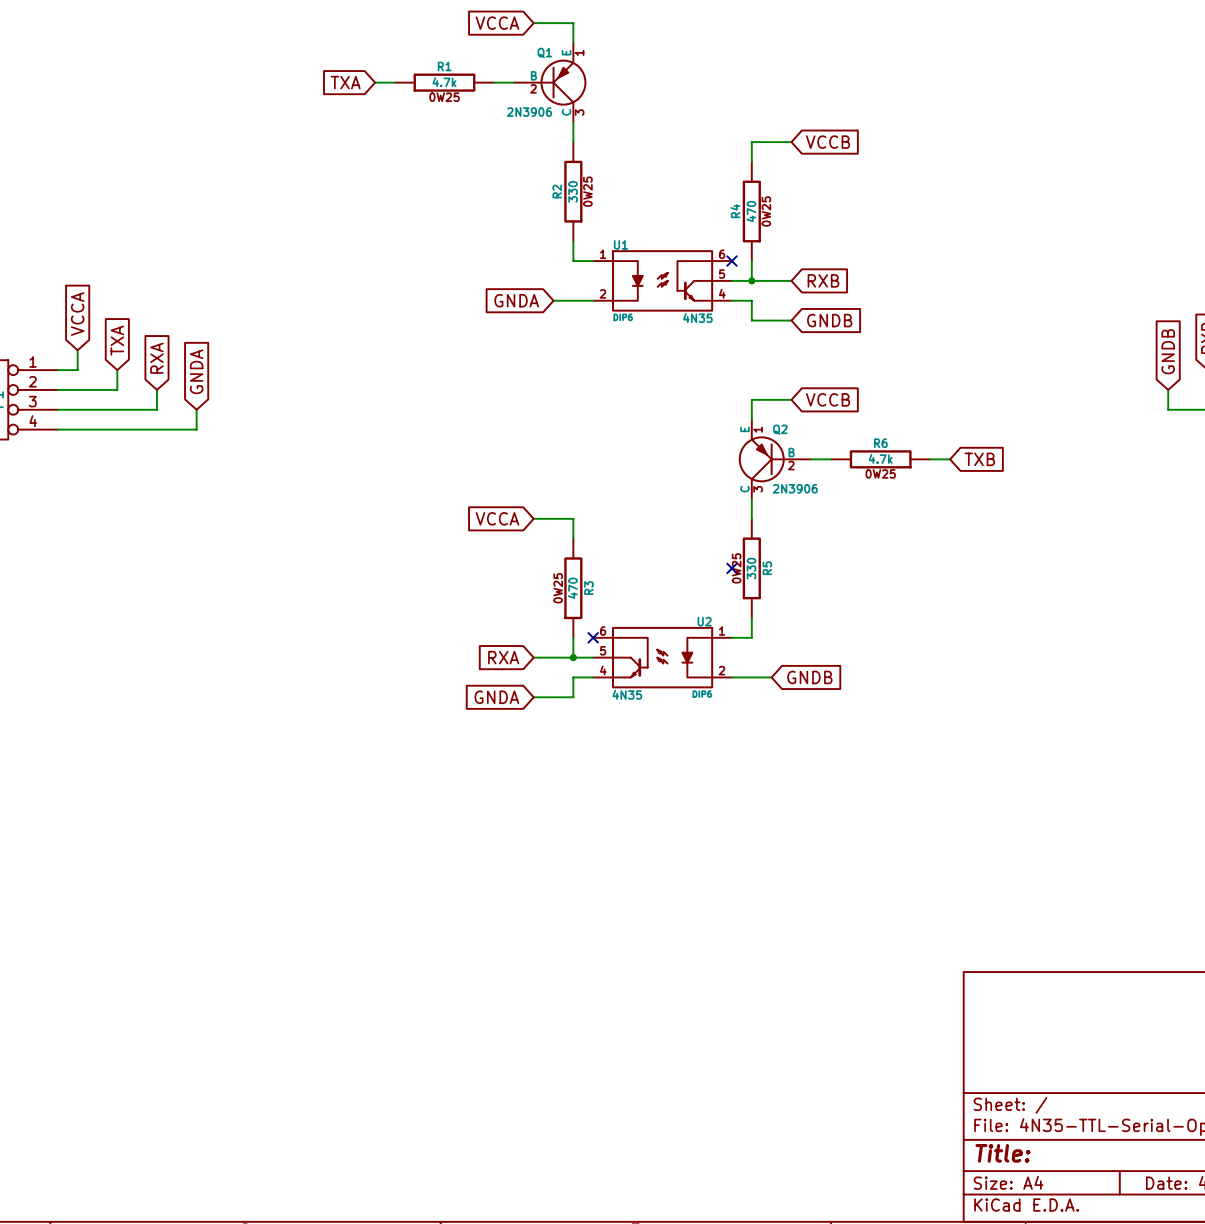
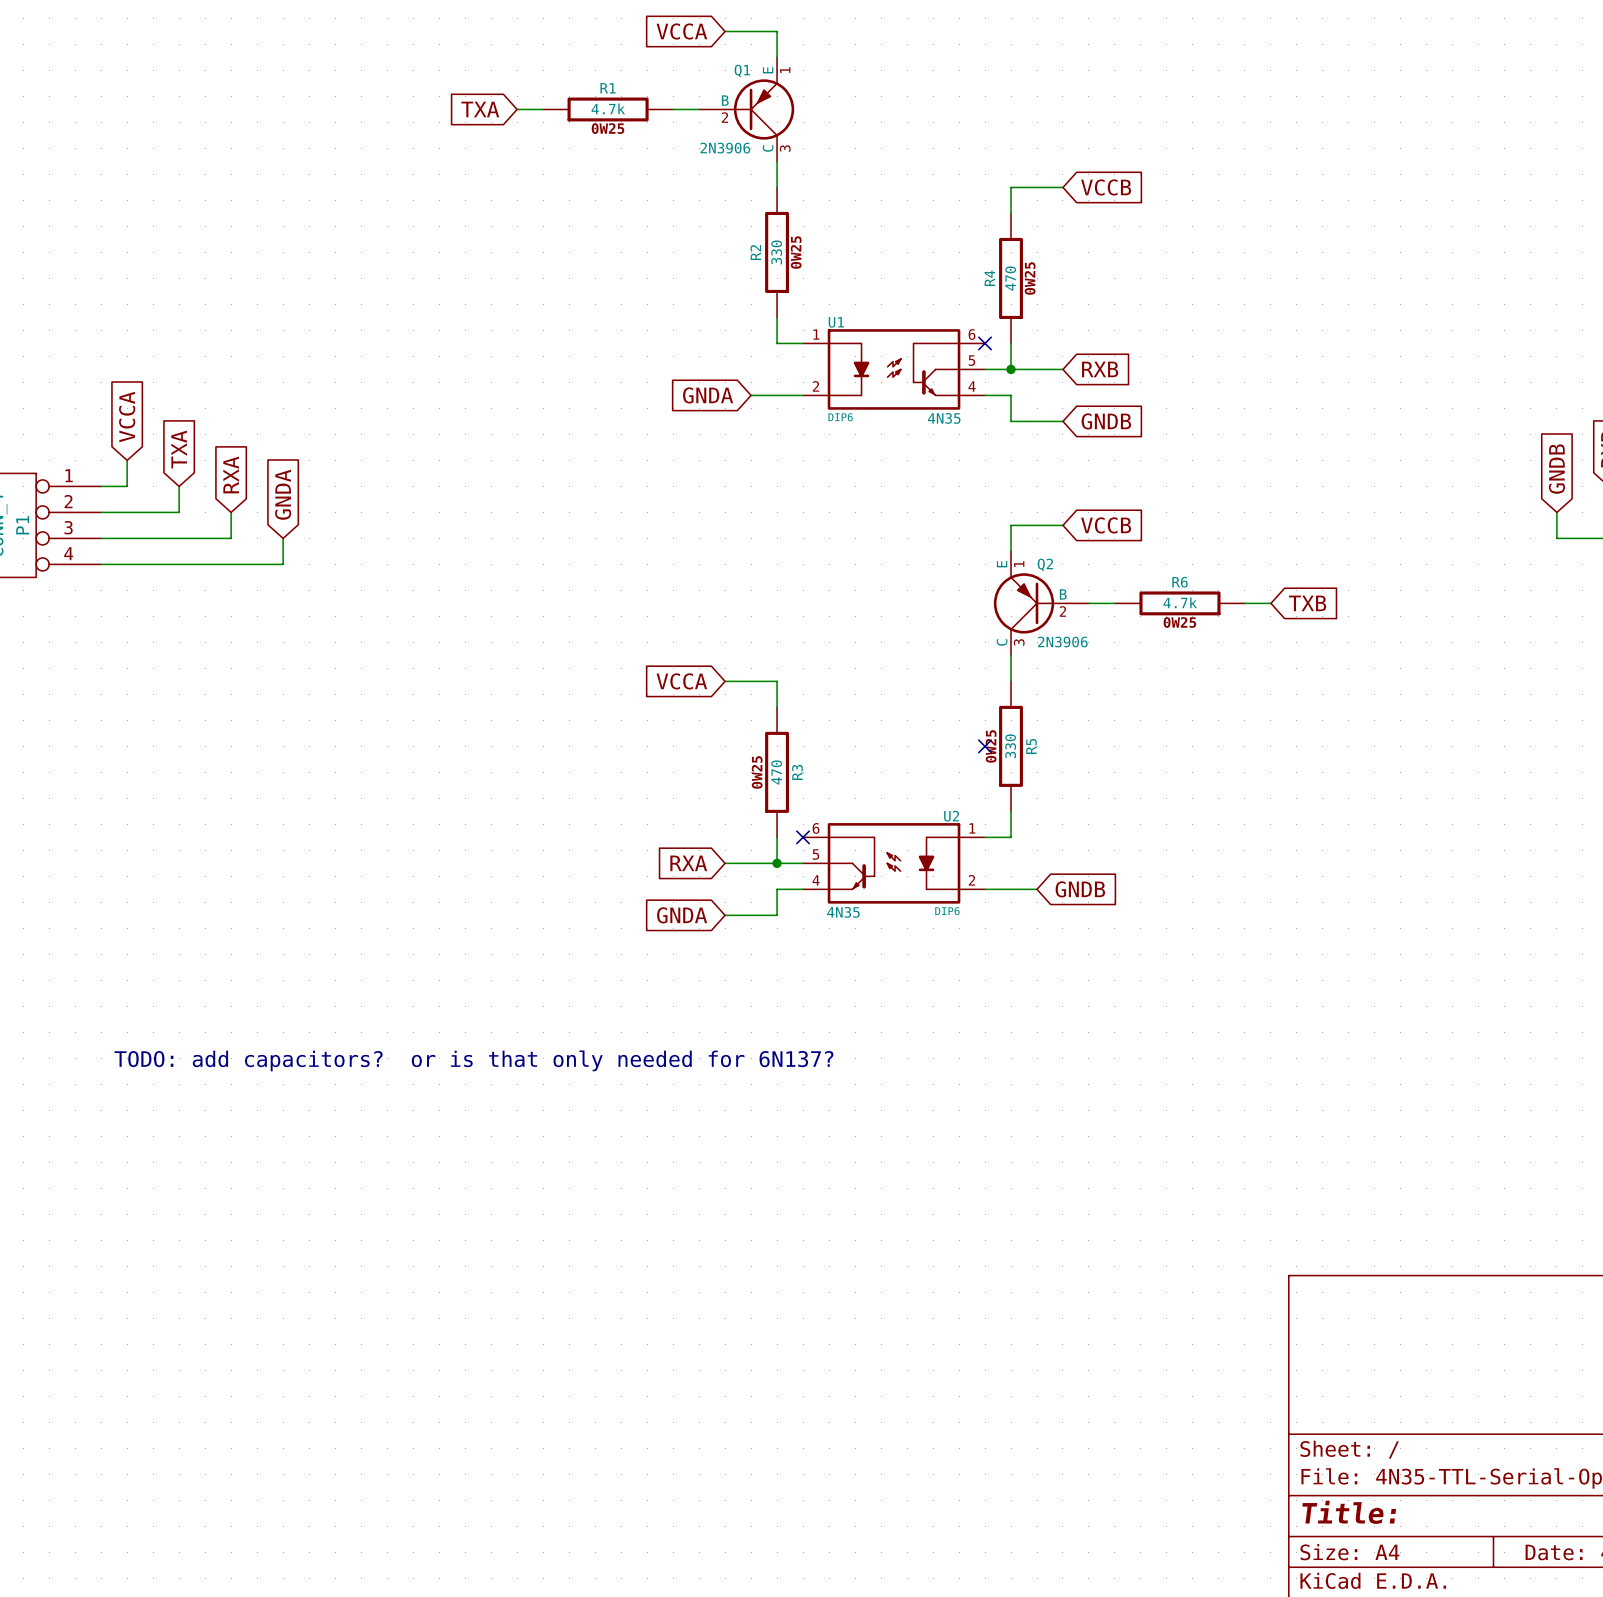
text: none -> TODO: add capacitors? or is that only needed for 6N137? (474, 1060)

